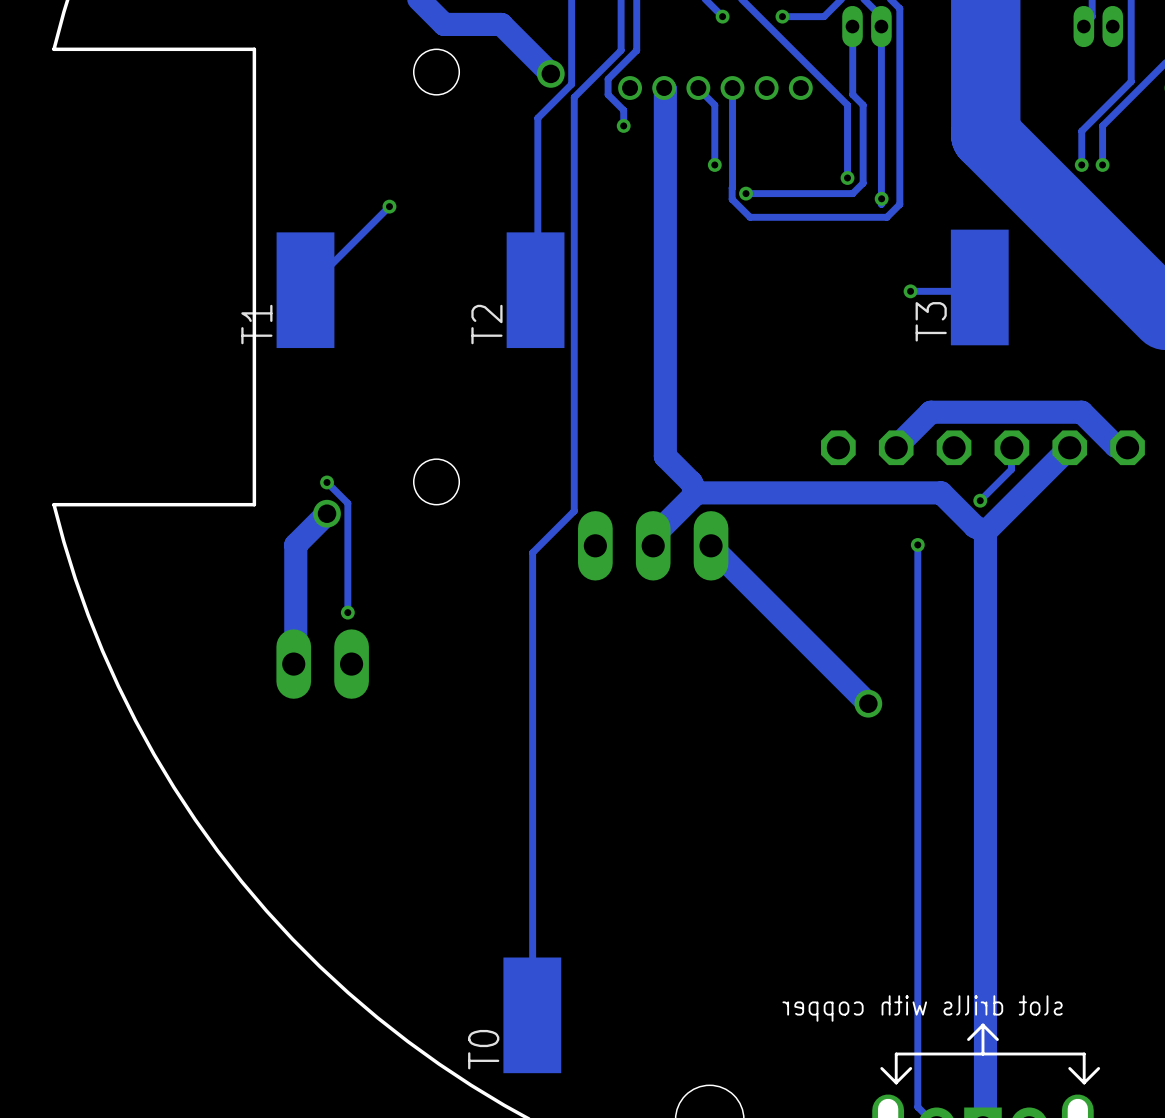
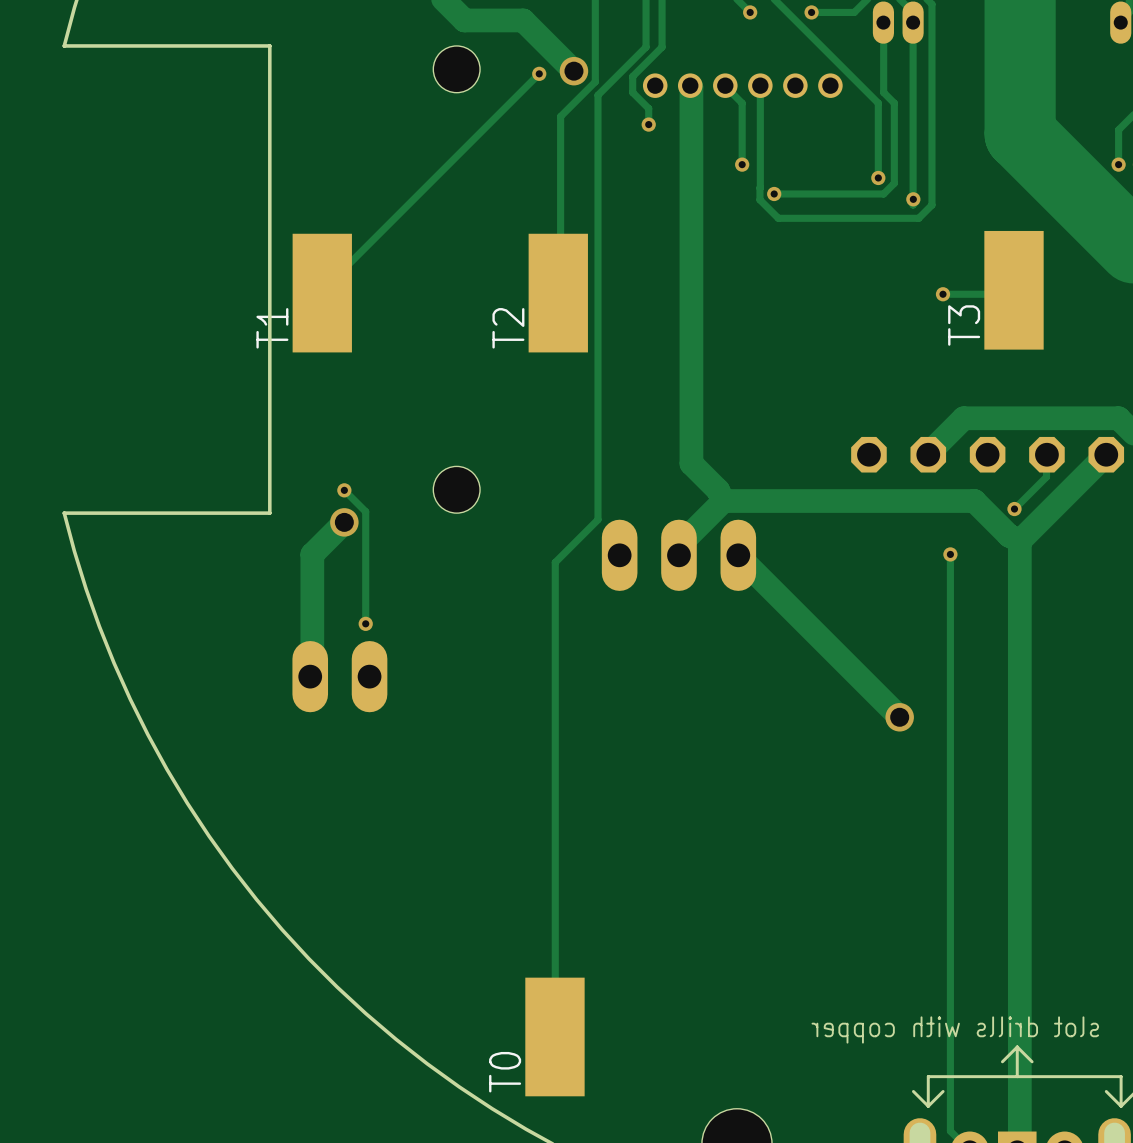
via: none -> (539, 73)
track: (389, 206) (305, 290) -> (539, 73) (320, 292) (322, 293)
via: (389, 206) -> none

